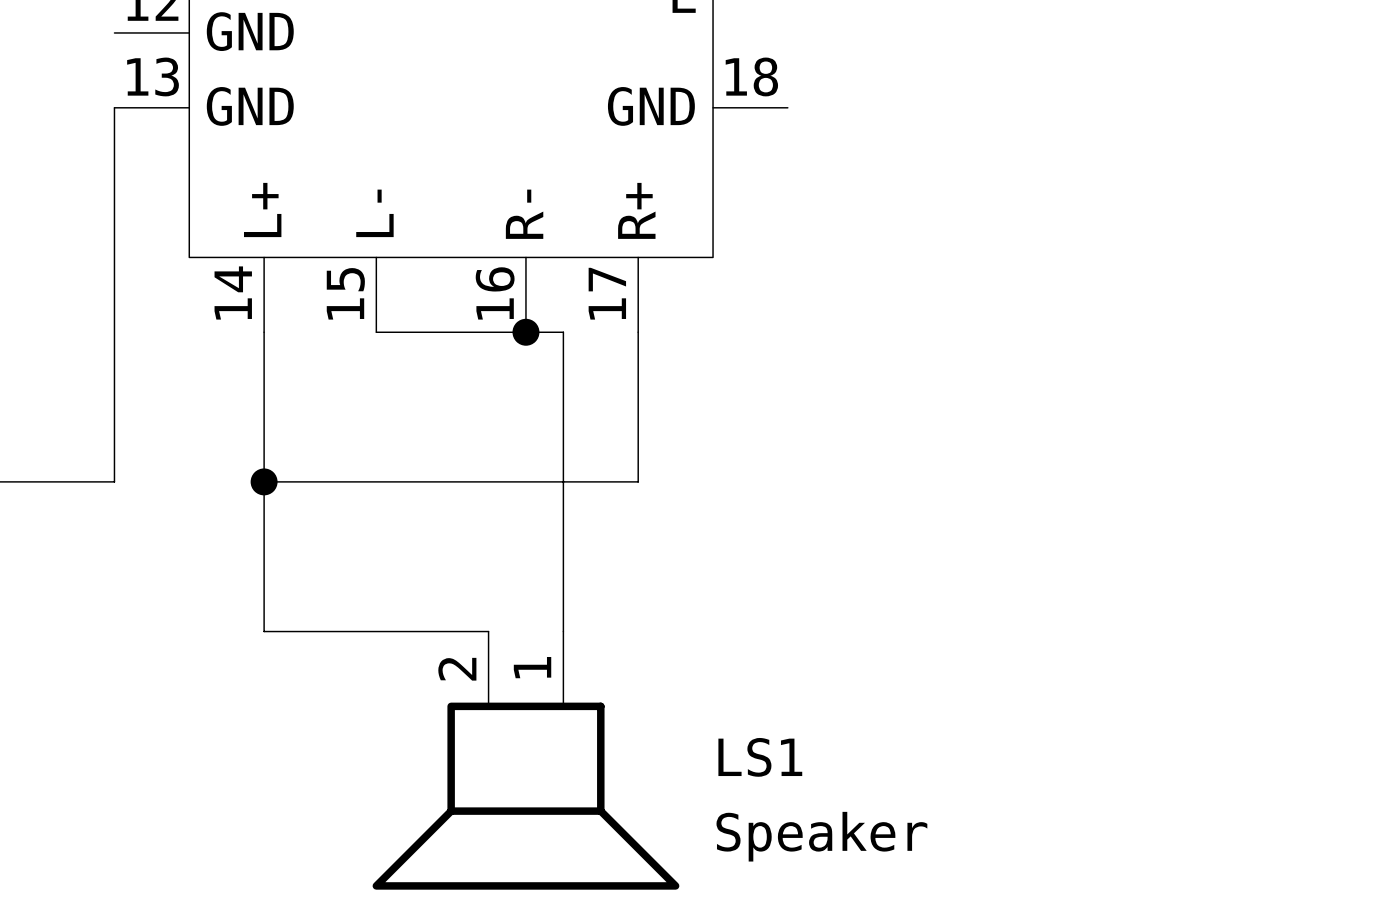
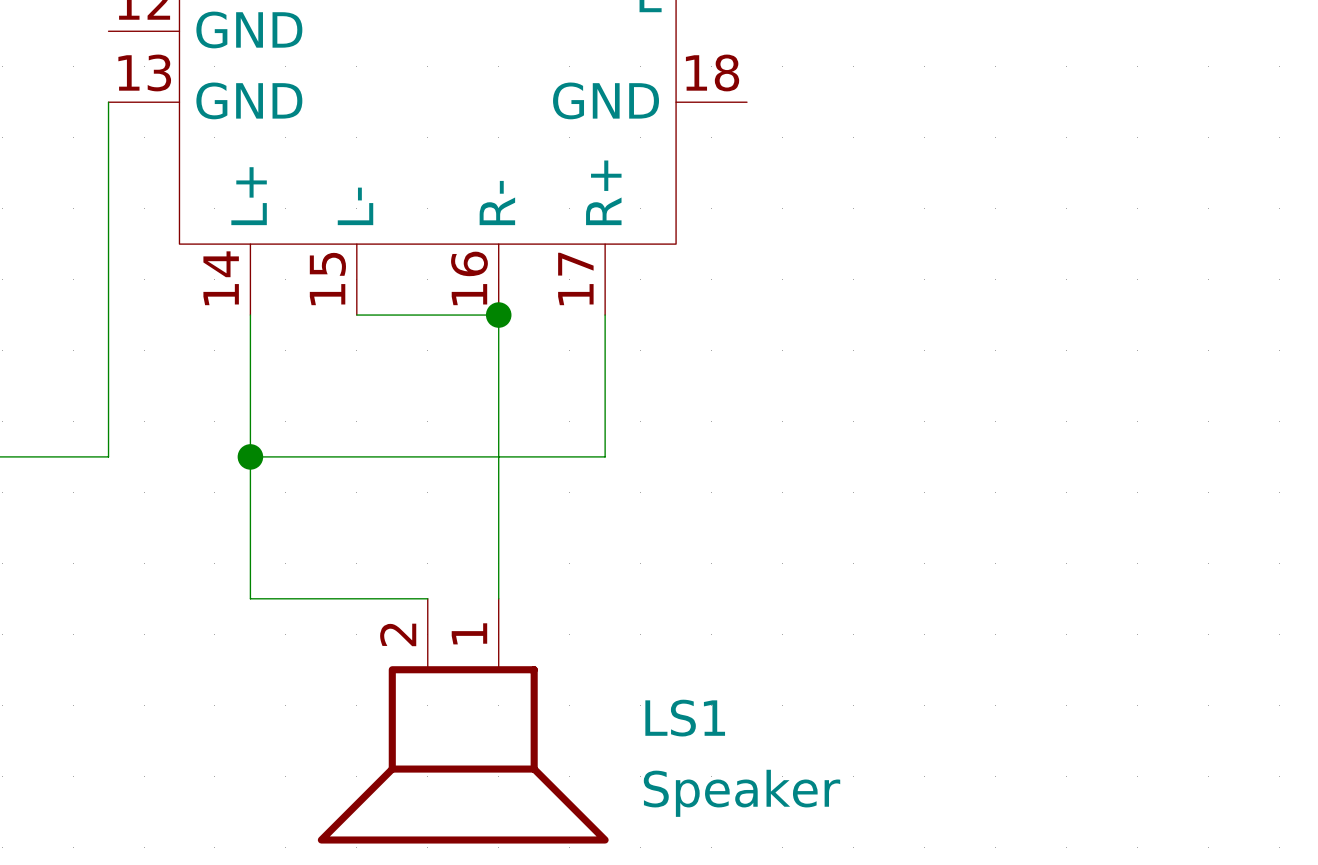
wire: (525, 332) (563, 332) (563, 631) -> (498, 315) (498, 598)
wire: (451, 631) (488, 631) -> none
LS1 position: (525, 760) -> (463, 721)

